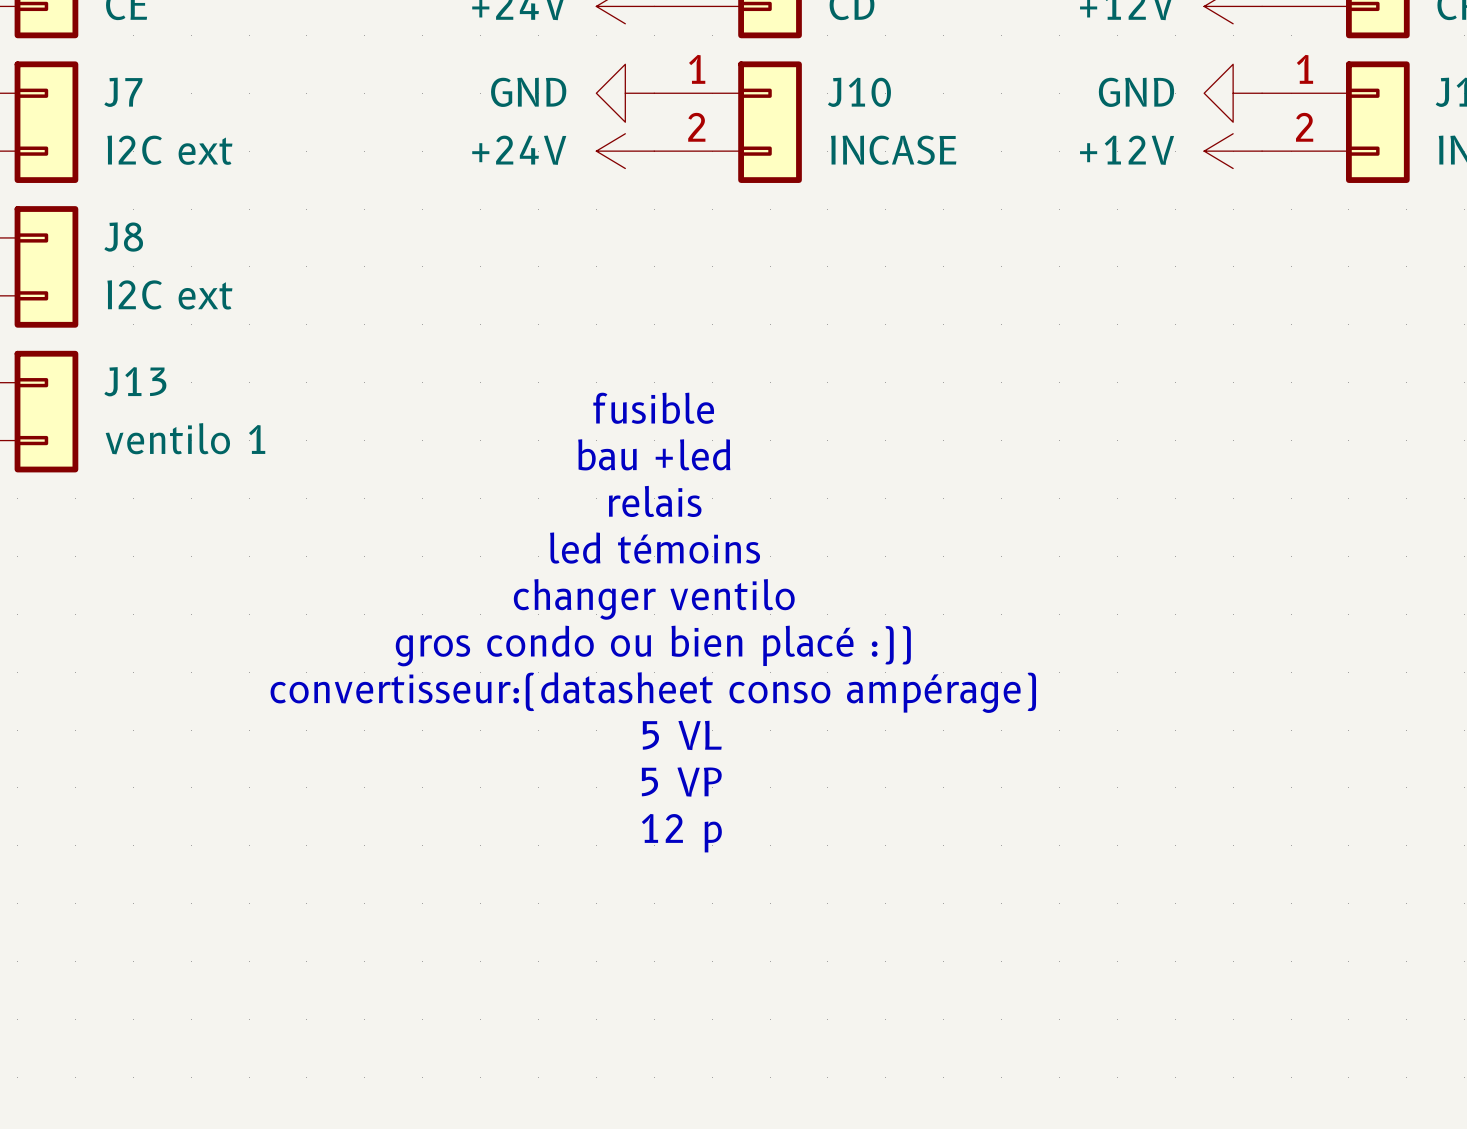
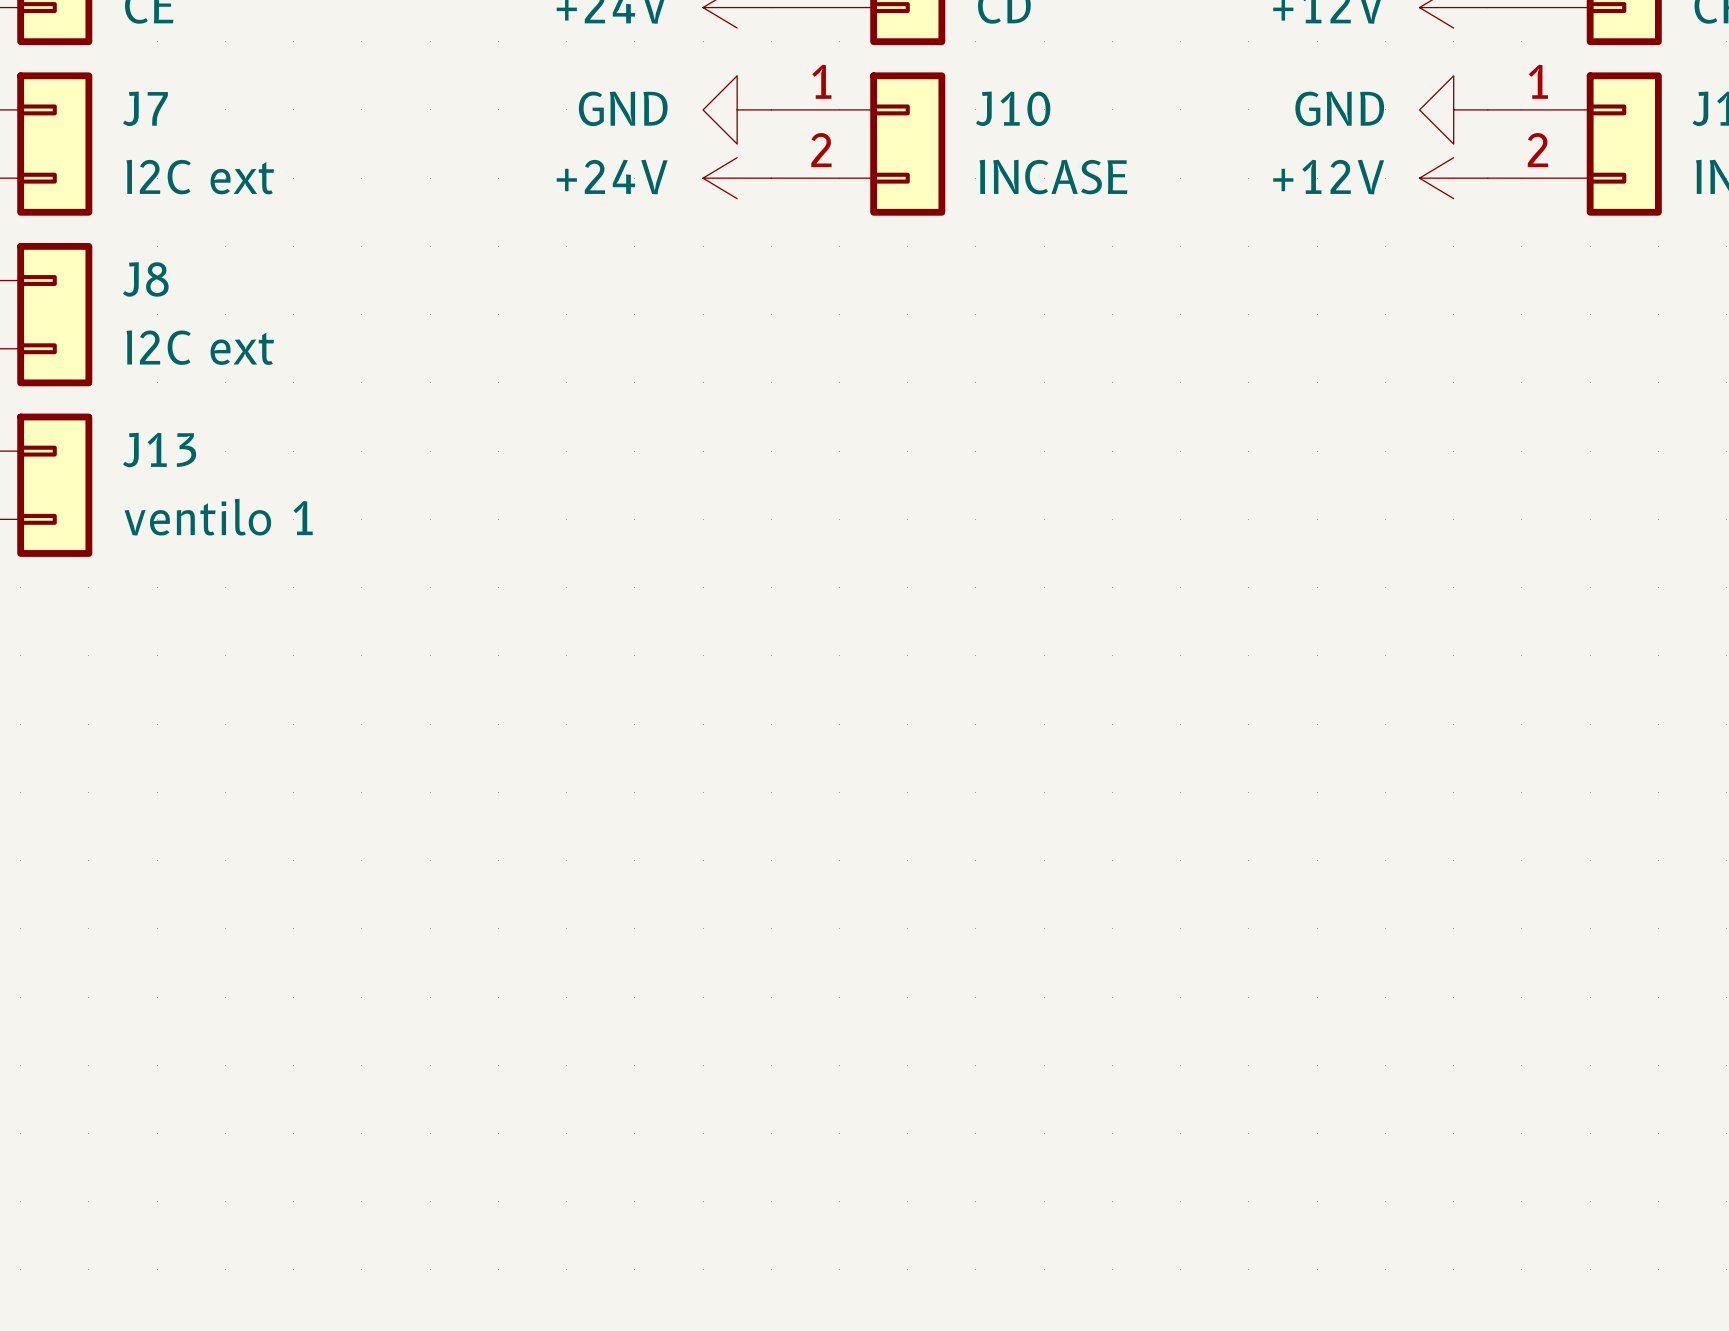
text: fusible (653, 408) -> none
text: bau +led (654, 454) -> none
text: relais (655, 501) -> none
text: led témoins (655, 548) -> none
text: changer ventilo (654, 599) -> none
text: gros condo ou bien placé :)) (653, 646) -> none
text: convertisseur:(datasheet conso ampérage) (653, 692) -> none
text: 5 VL (682, 735) -> none
text: 5 VP (681, 782) -> none
text: 12 p (681, 833) -> none

